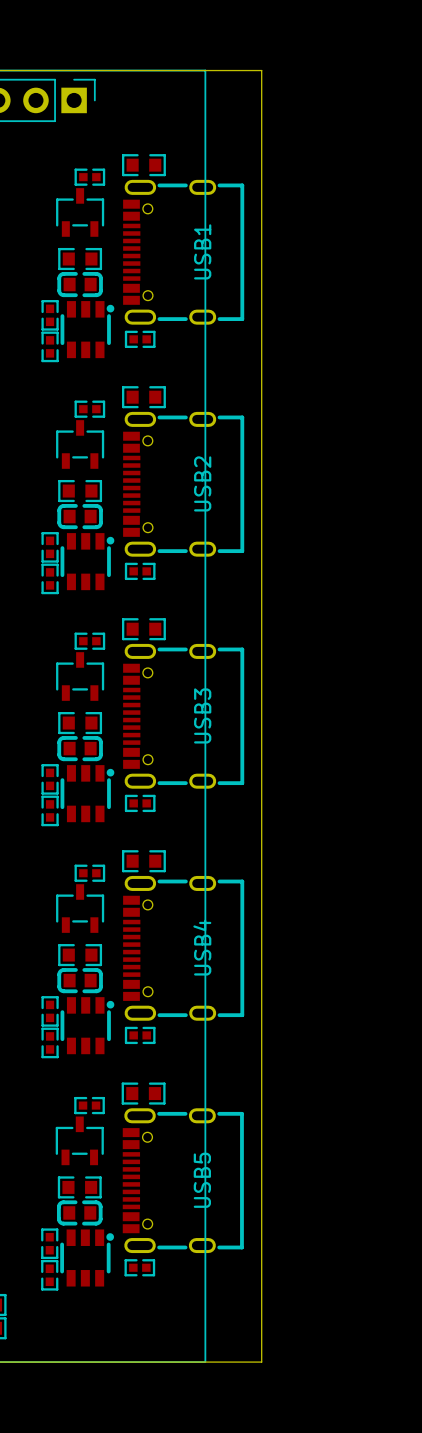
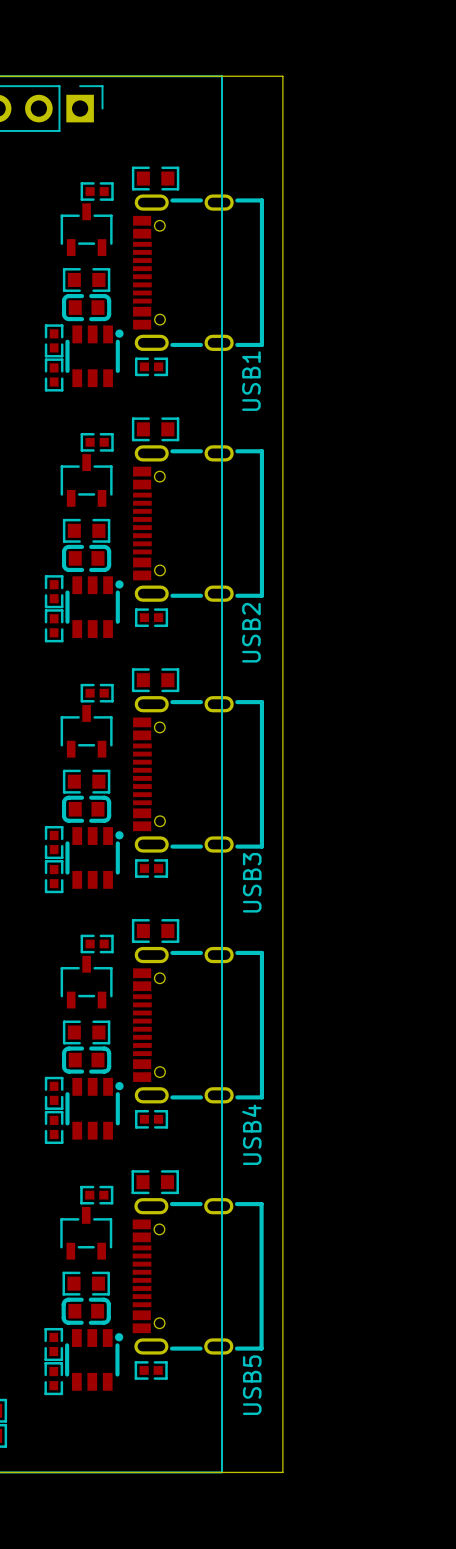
USB1 name position: USB1 (202, 251) -> USB1 (251, 381)
USB2 name position: USB2 (202, 483) -> USB2 (251, 632)
USB3 name position: USB3 (202, 715) -> USB3 (252, 882)
USB4 name position: USB4 (202, 947) -> USB4 (251, 1134)
USB5 name position: USB5 (202, 1180) -> USB5 (252, 1385)

